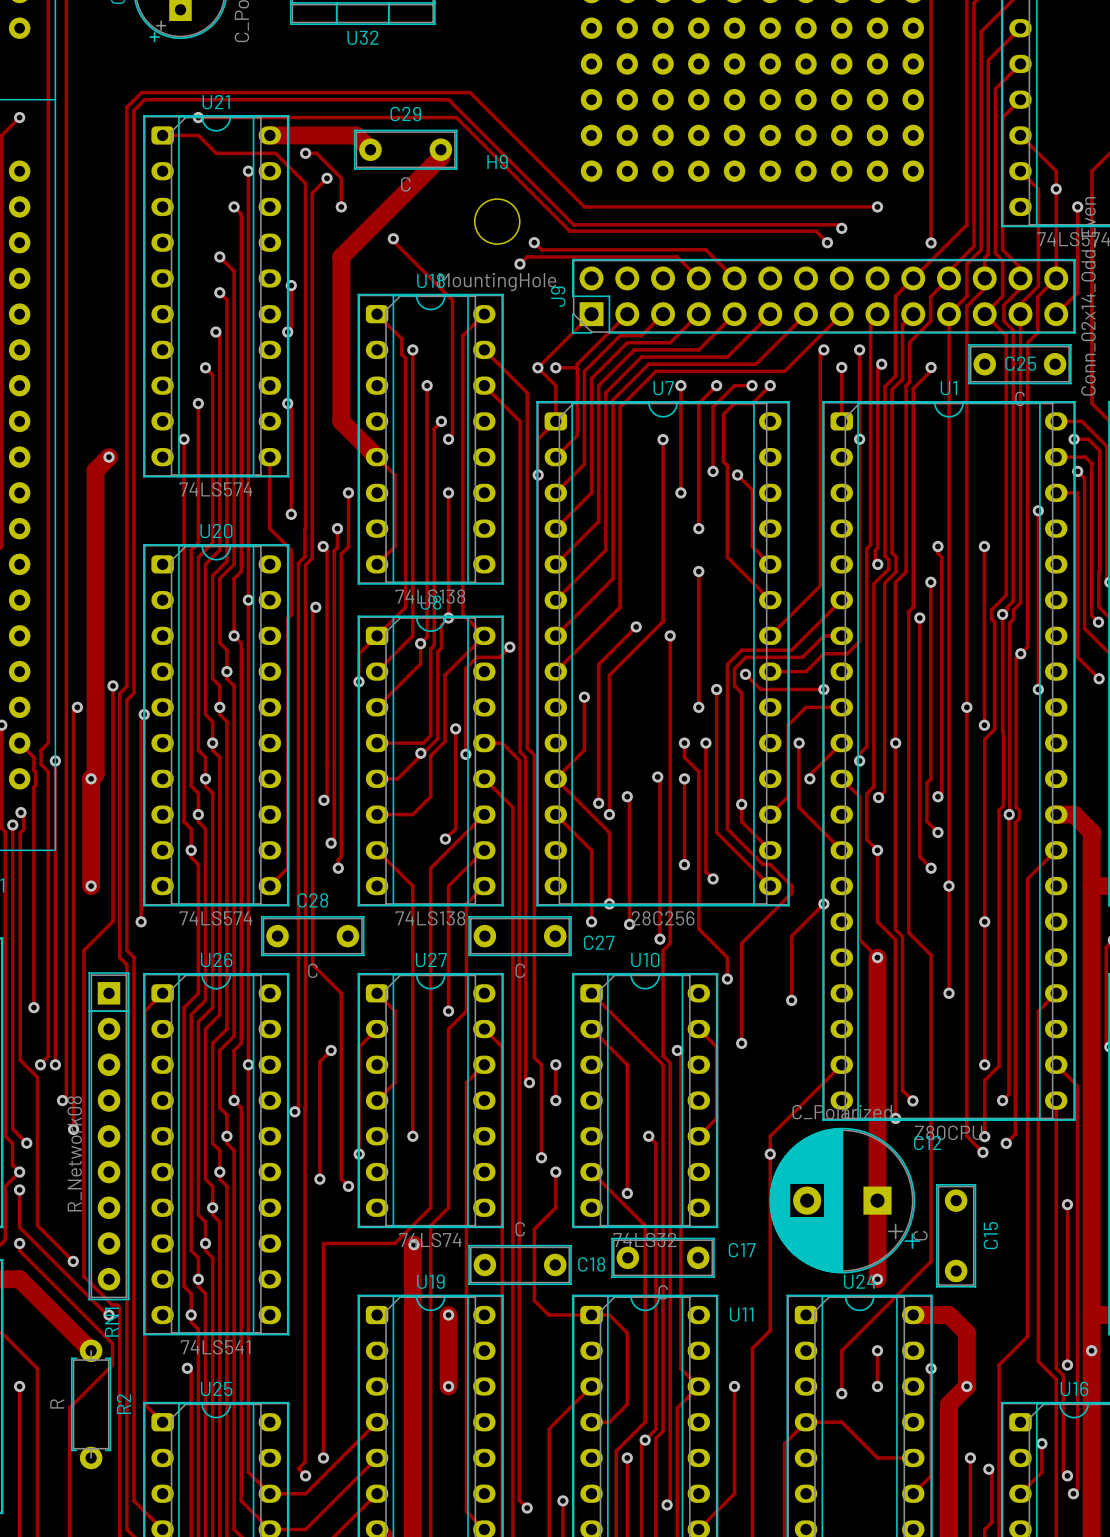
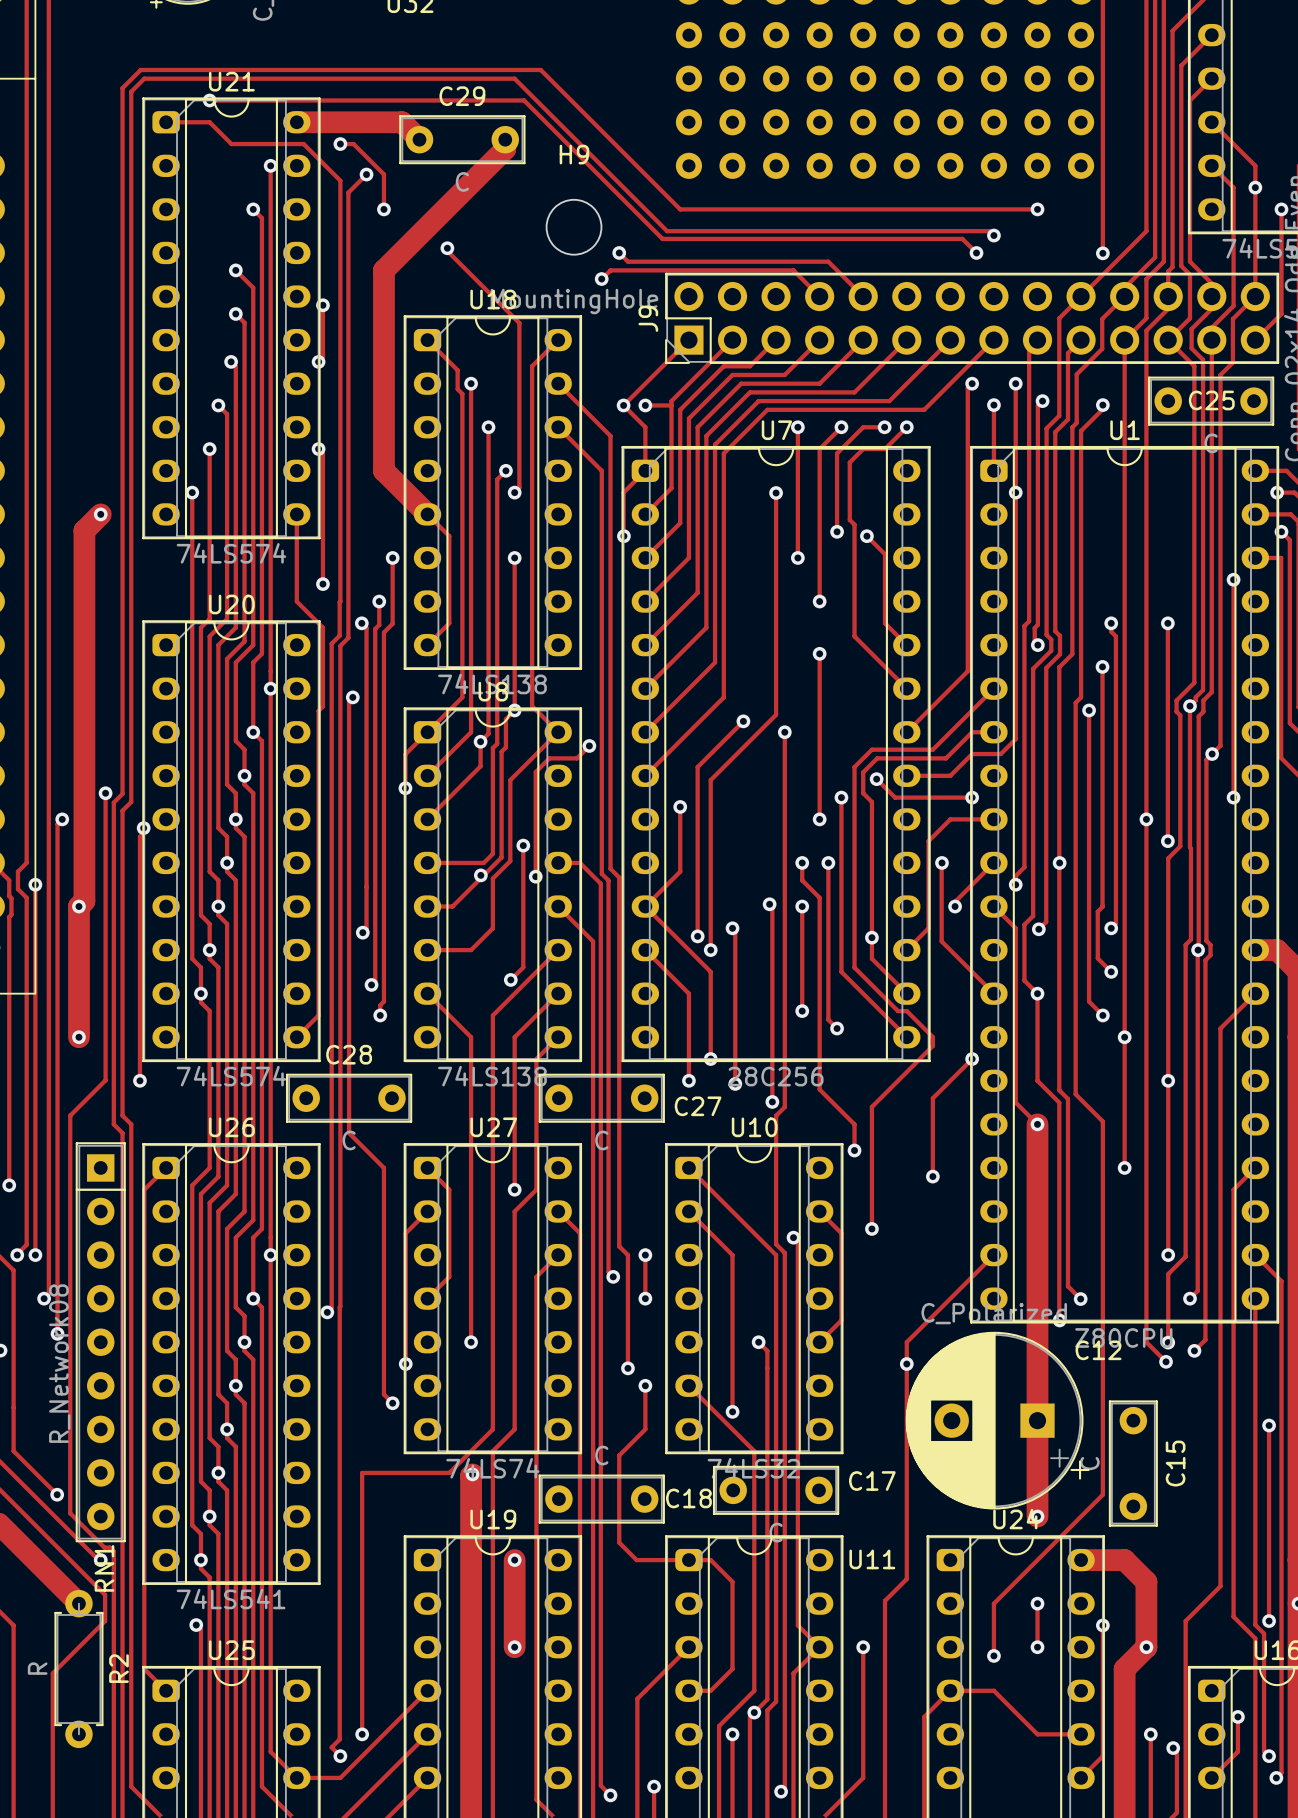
track: (331, 1050) (319, 1061) (319, 1179) -> none
via: (331, 1050) -> none
via: (319, 1179) -> none

